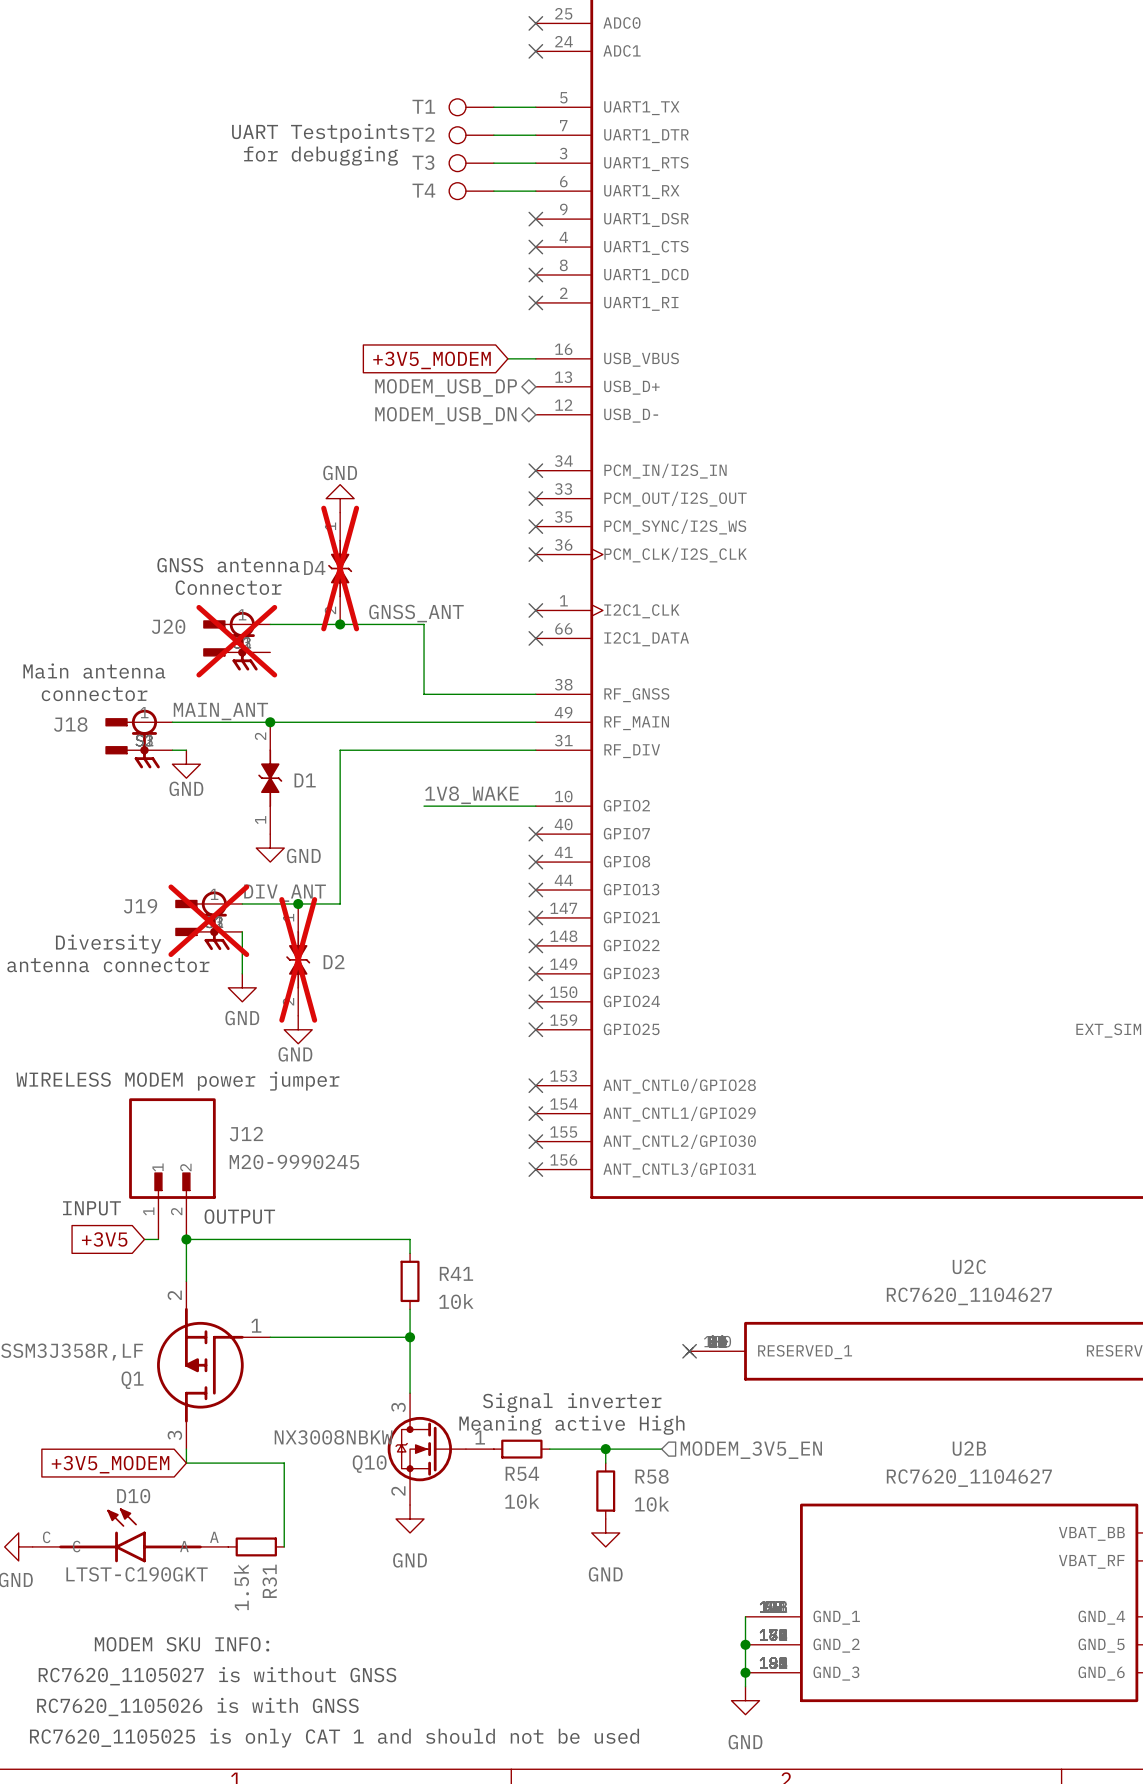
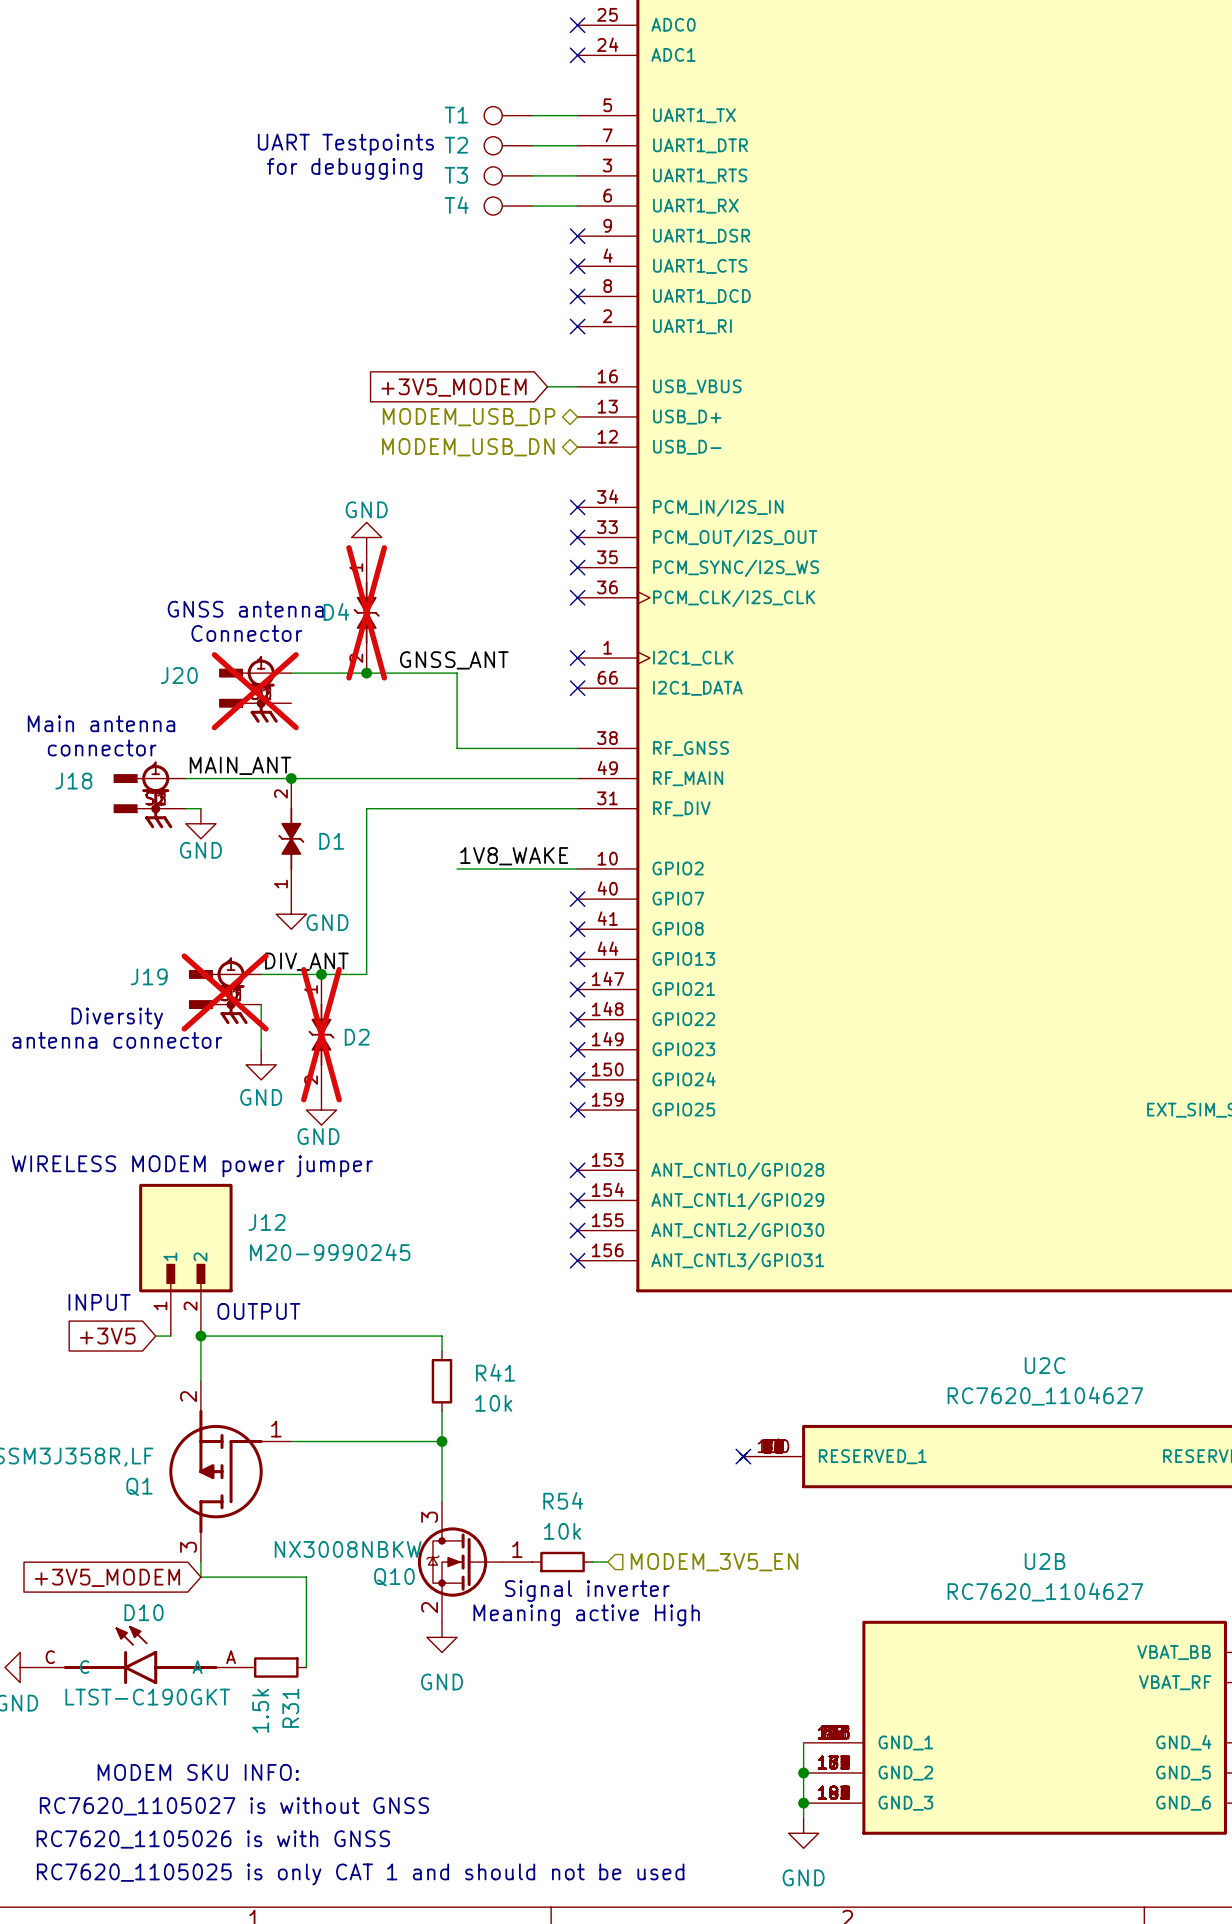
text position: Signal inverter (572, 1402) -> Signal inverter (587, 1591)
text position: Meaning active High (571, 1425) -> Meaning active High (586, 1615)
wire: (563, 1449) (661, 1449) -> none
wire: (605, 1449) (605, 1463) -> none
junction: (605, 1449) -> none
hierarchical label position: MODEM_3V5_EN (751, 1450) -> MODEM_3V5_EN (714, 1562)
R54 name position: R54 (522, 1473) -> R54 (563, 1500)
R58: 10k (605, 1491) -> none
R54 value position: 10k (522, 1501) -> 10k (562, 1531)
power symbol: GND (605, 1532) -> none

